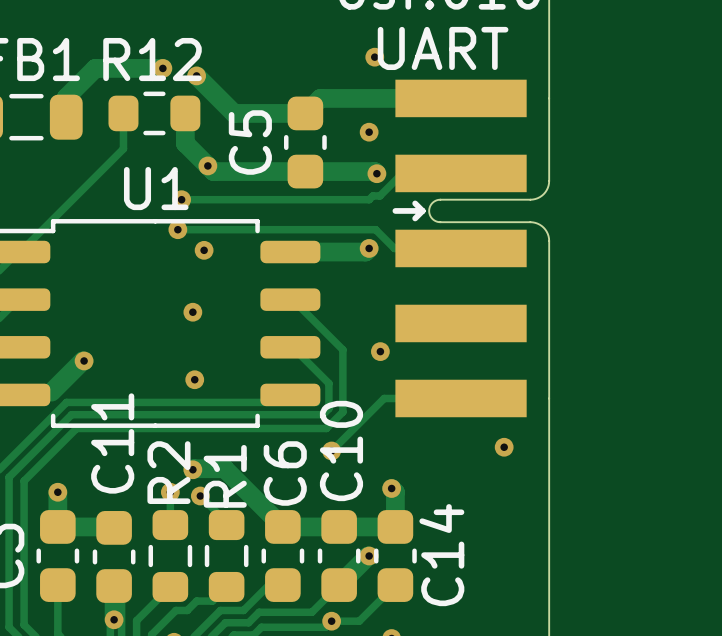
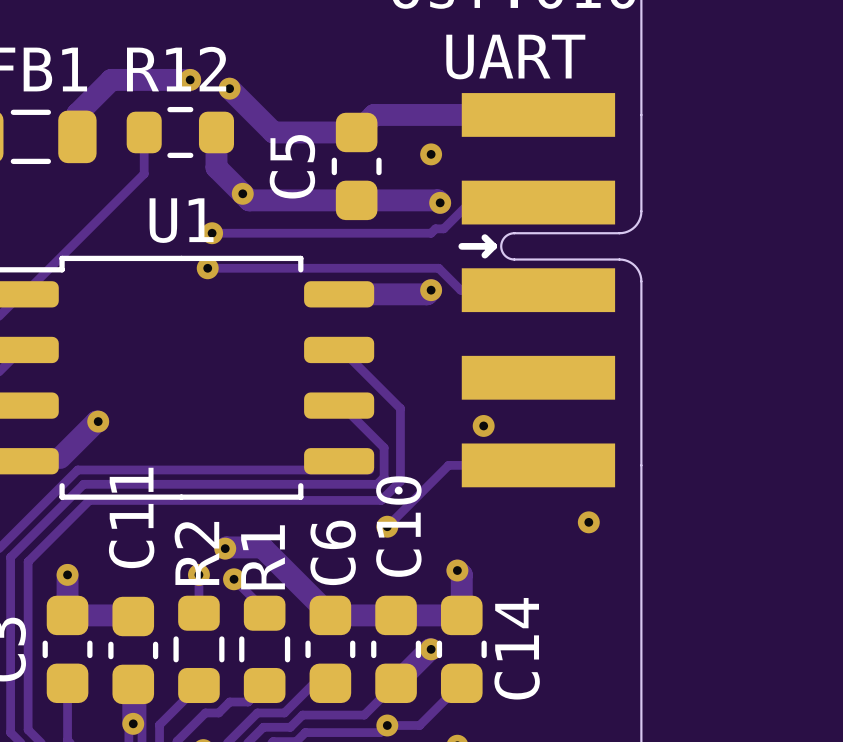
via: (374, 57) -> none
via: (204, 250) -> none
via: (192, 312) -> none
via position: (380, 351) -> (483, 425)
via: (194, 379) -> none

